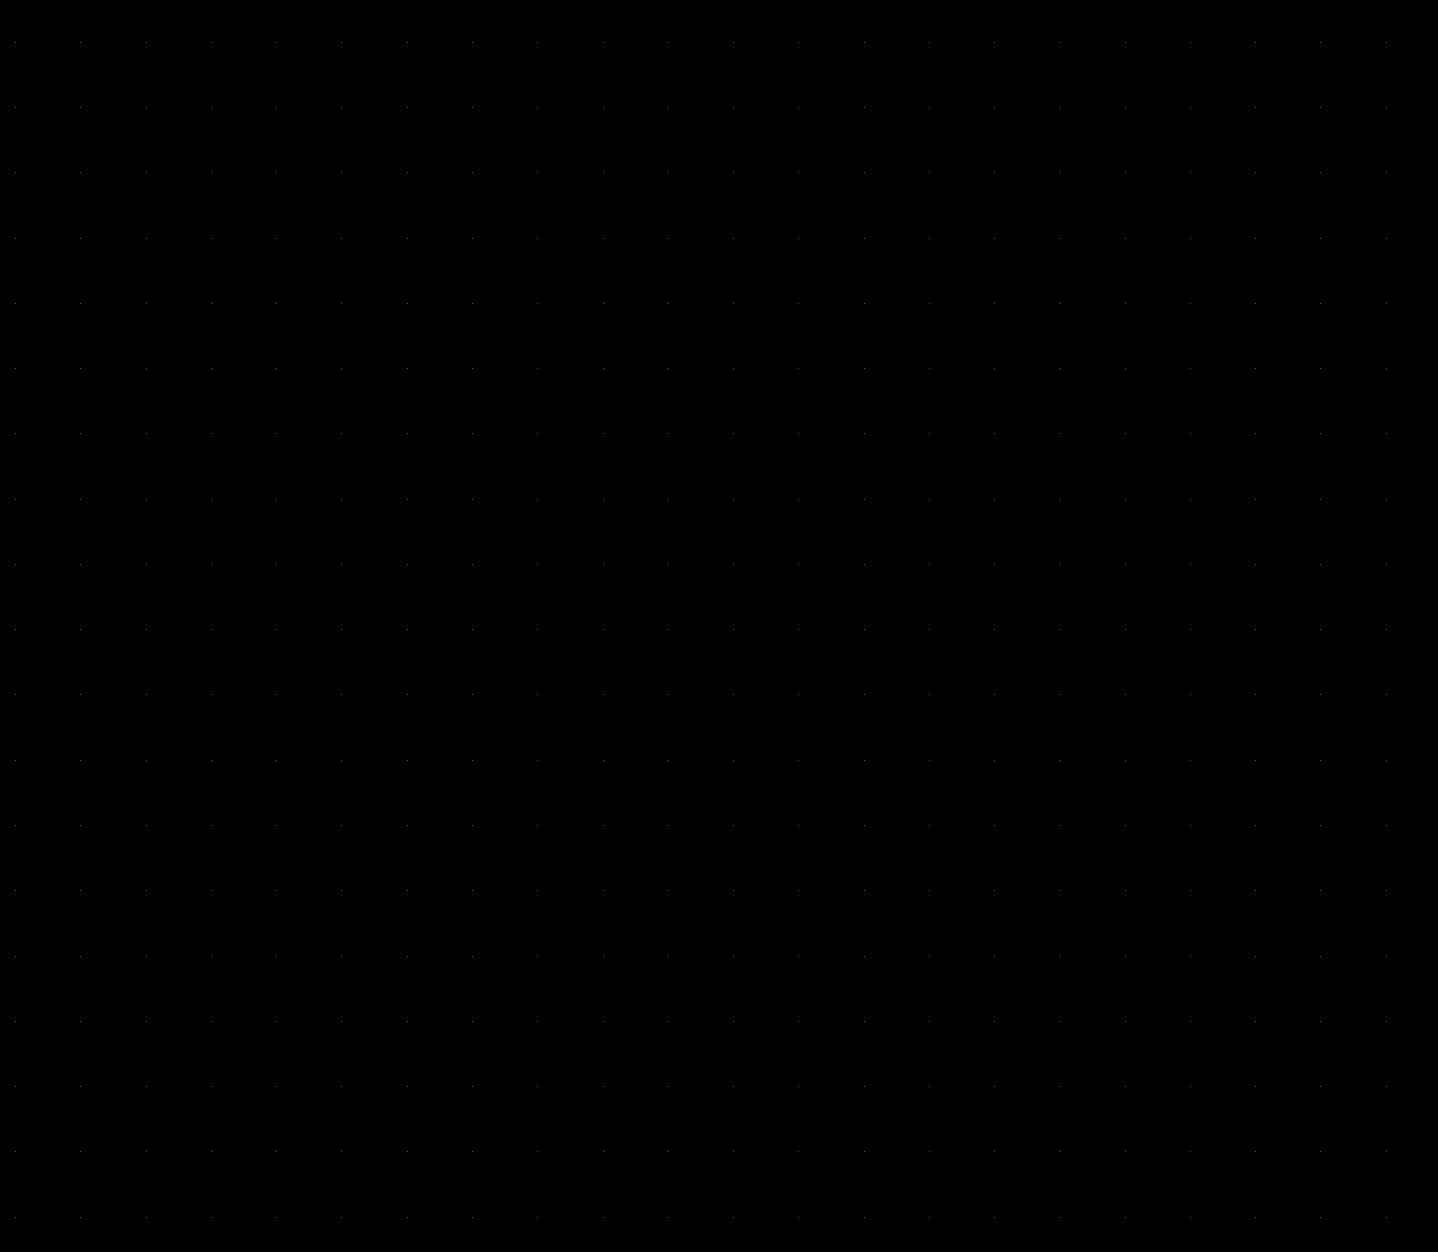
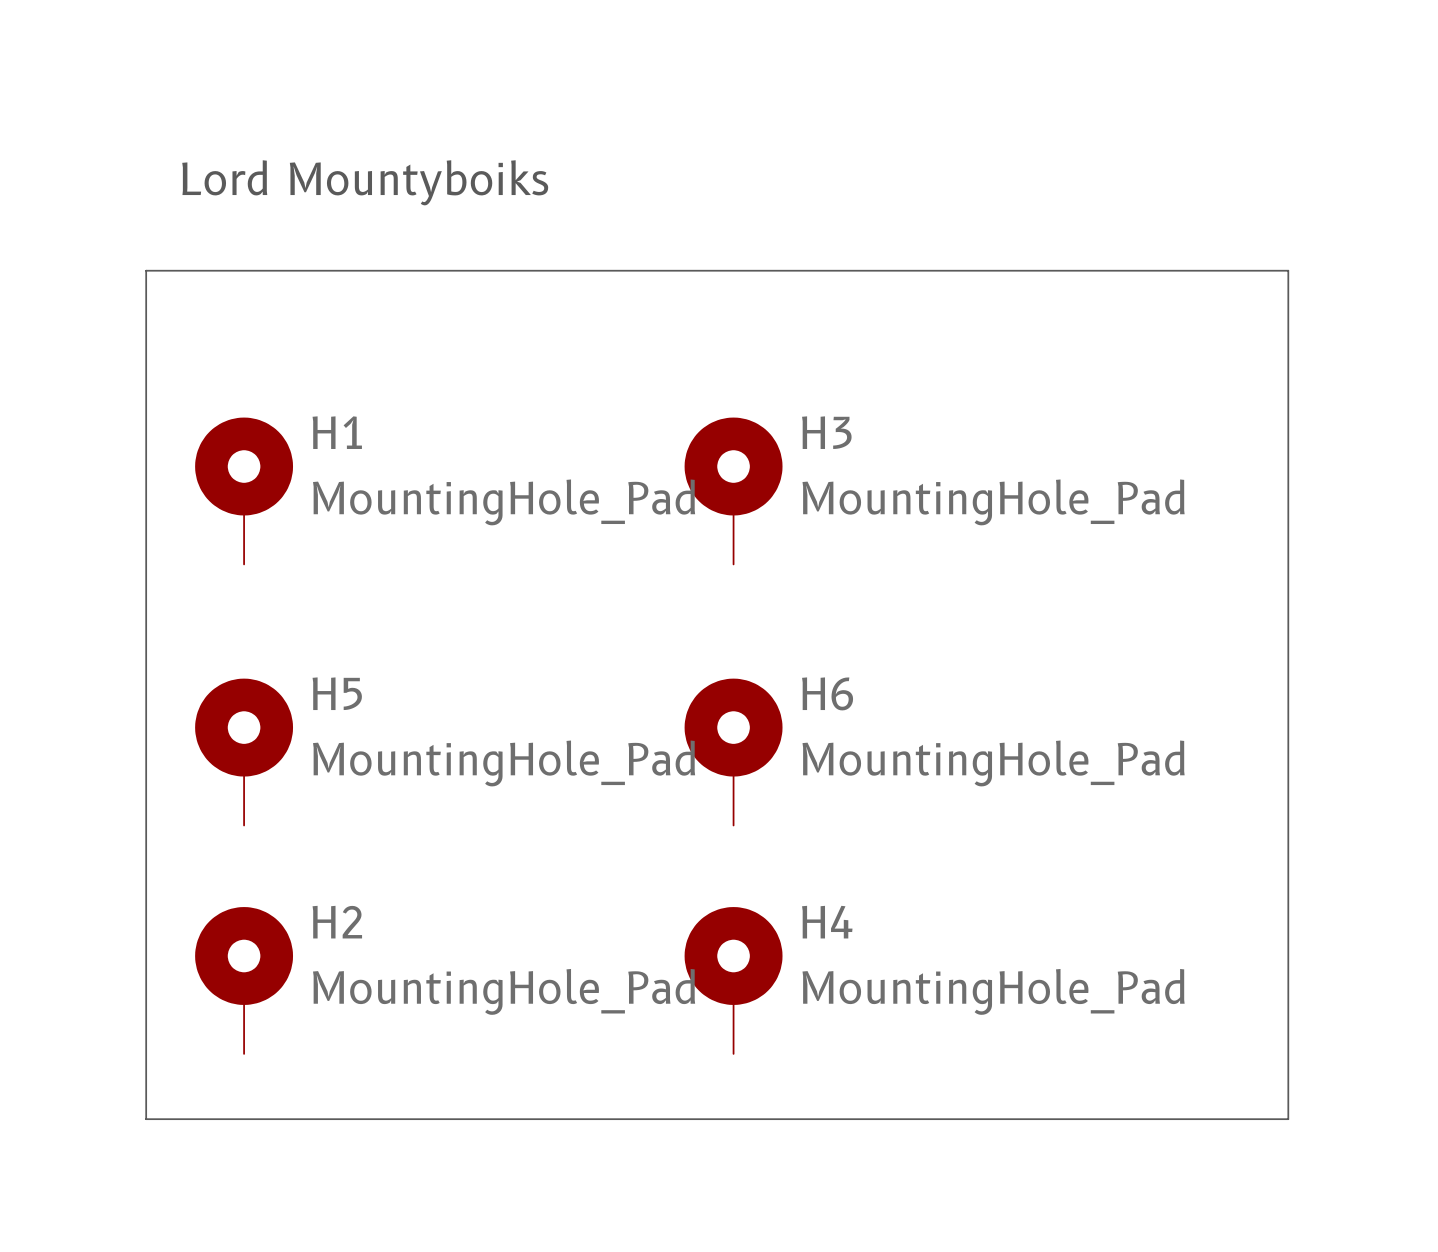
text: none -> Lord Mountyboiks (365, 182)
line: none -> (146, 270) (1288, 270) (1288, 1119) (146, 1119) (146, 270)
H1: none -> MountingHole_Pad (244, 490)
H3: none -> MountingHole_Pad (733, 490)
H5: none -> MountingHole_Pad (244, 752)
H6: none -> MountingHole_Pad (733, 752)
H2: none -> MountingHole_Pad (244, 980)
H4: none -> MountingHole_Pad (733, 980)

